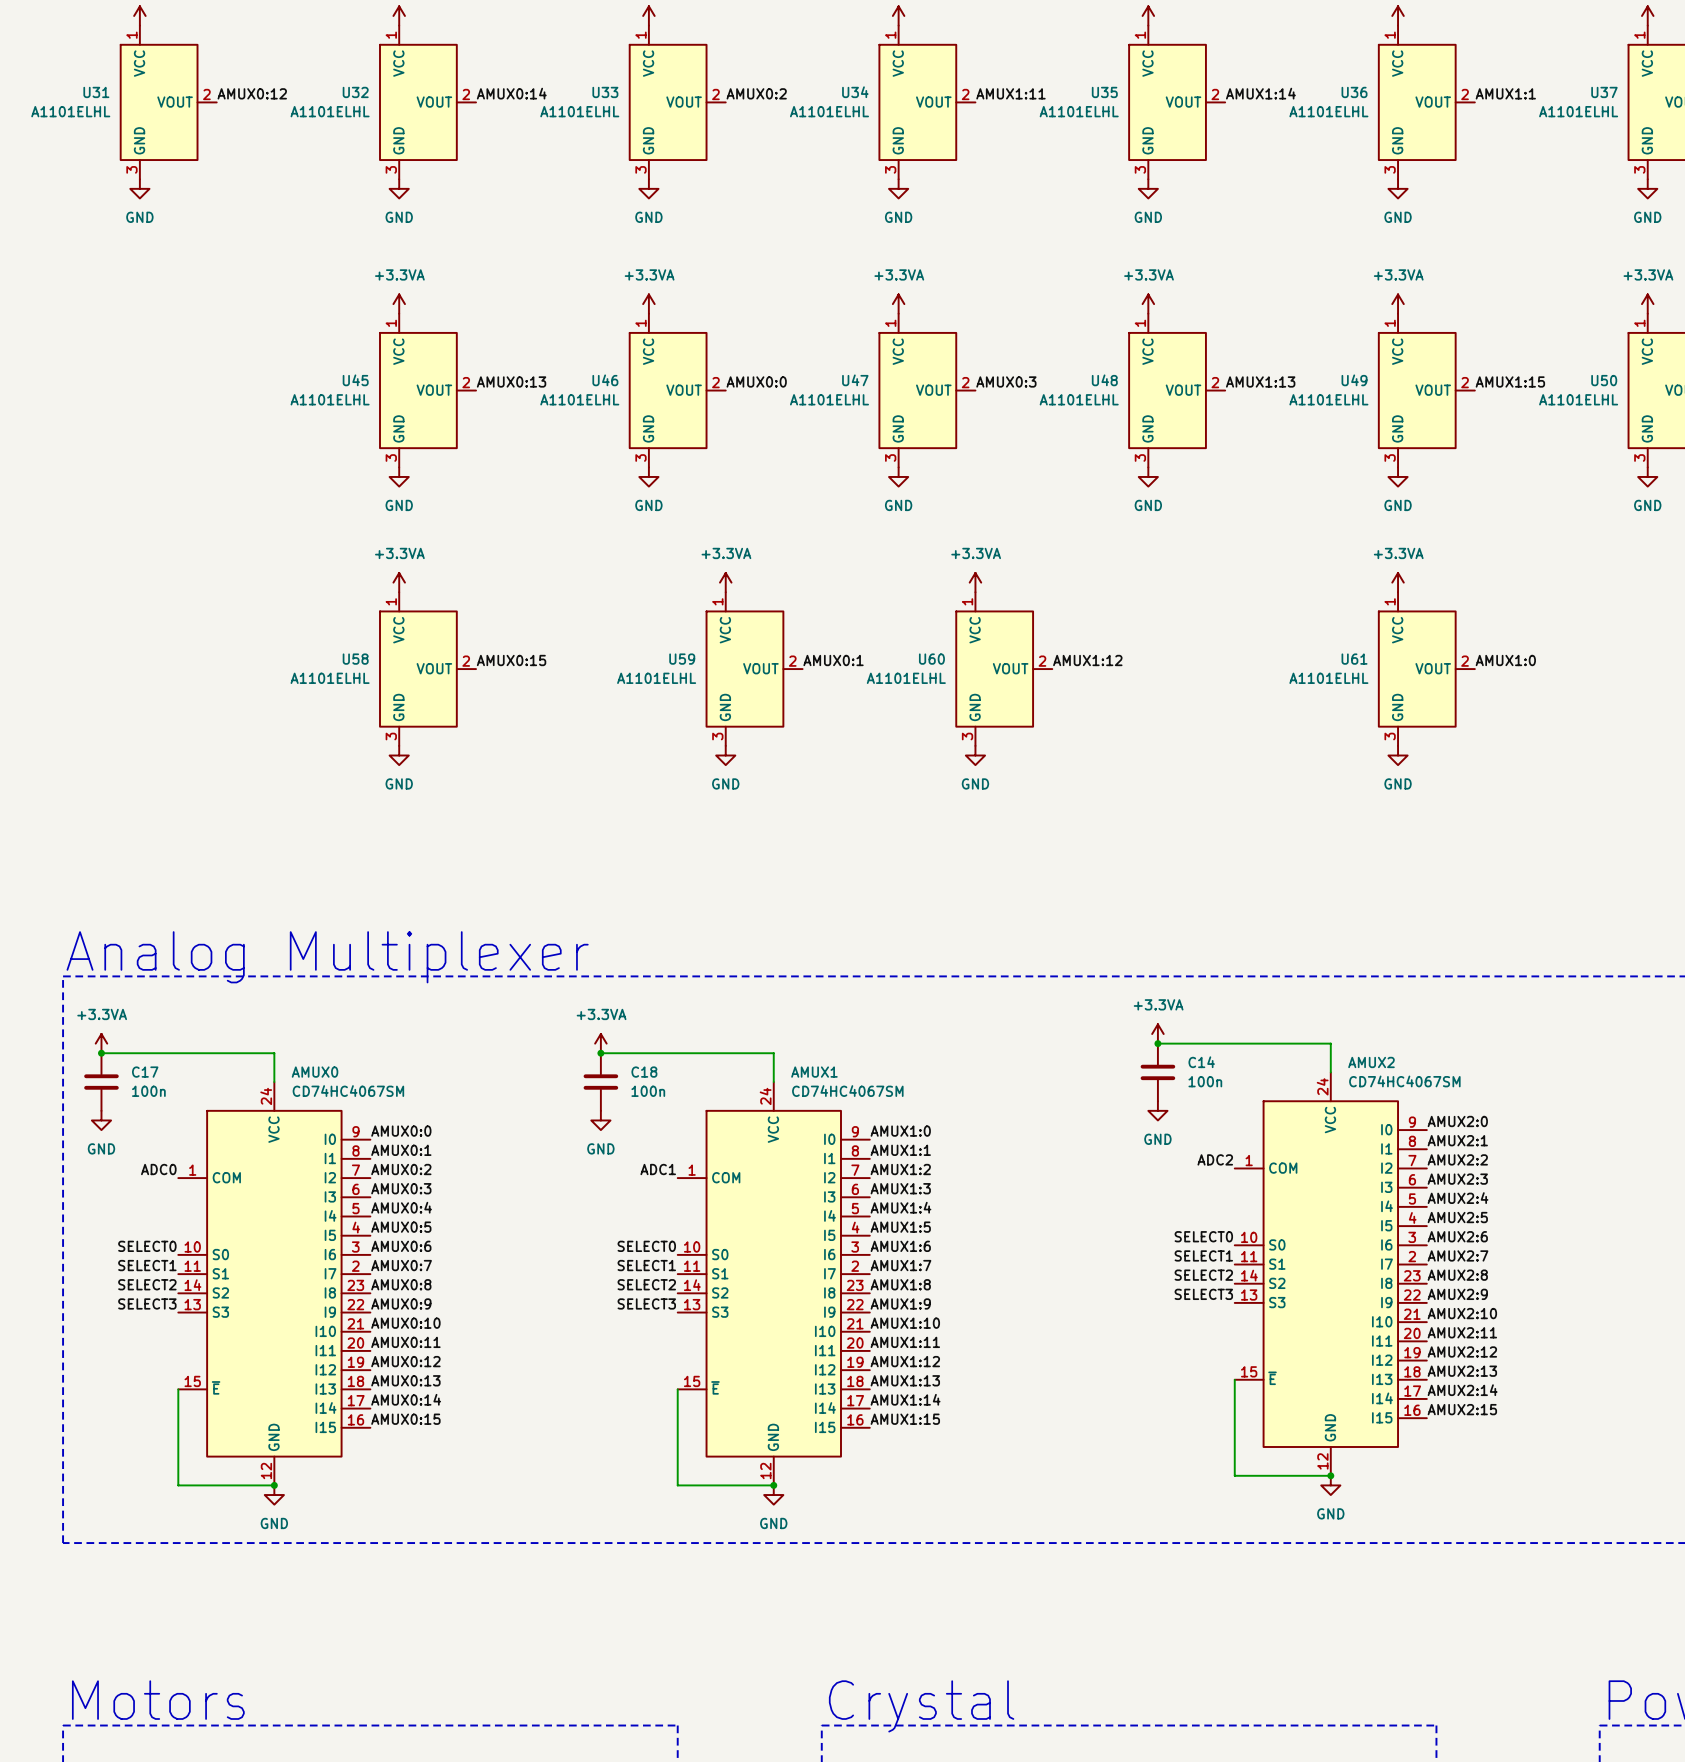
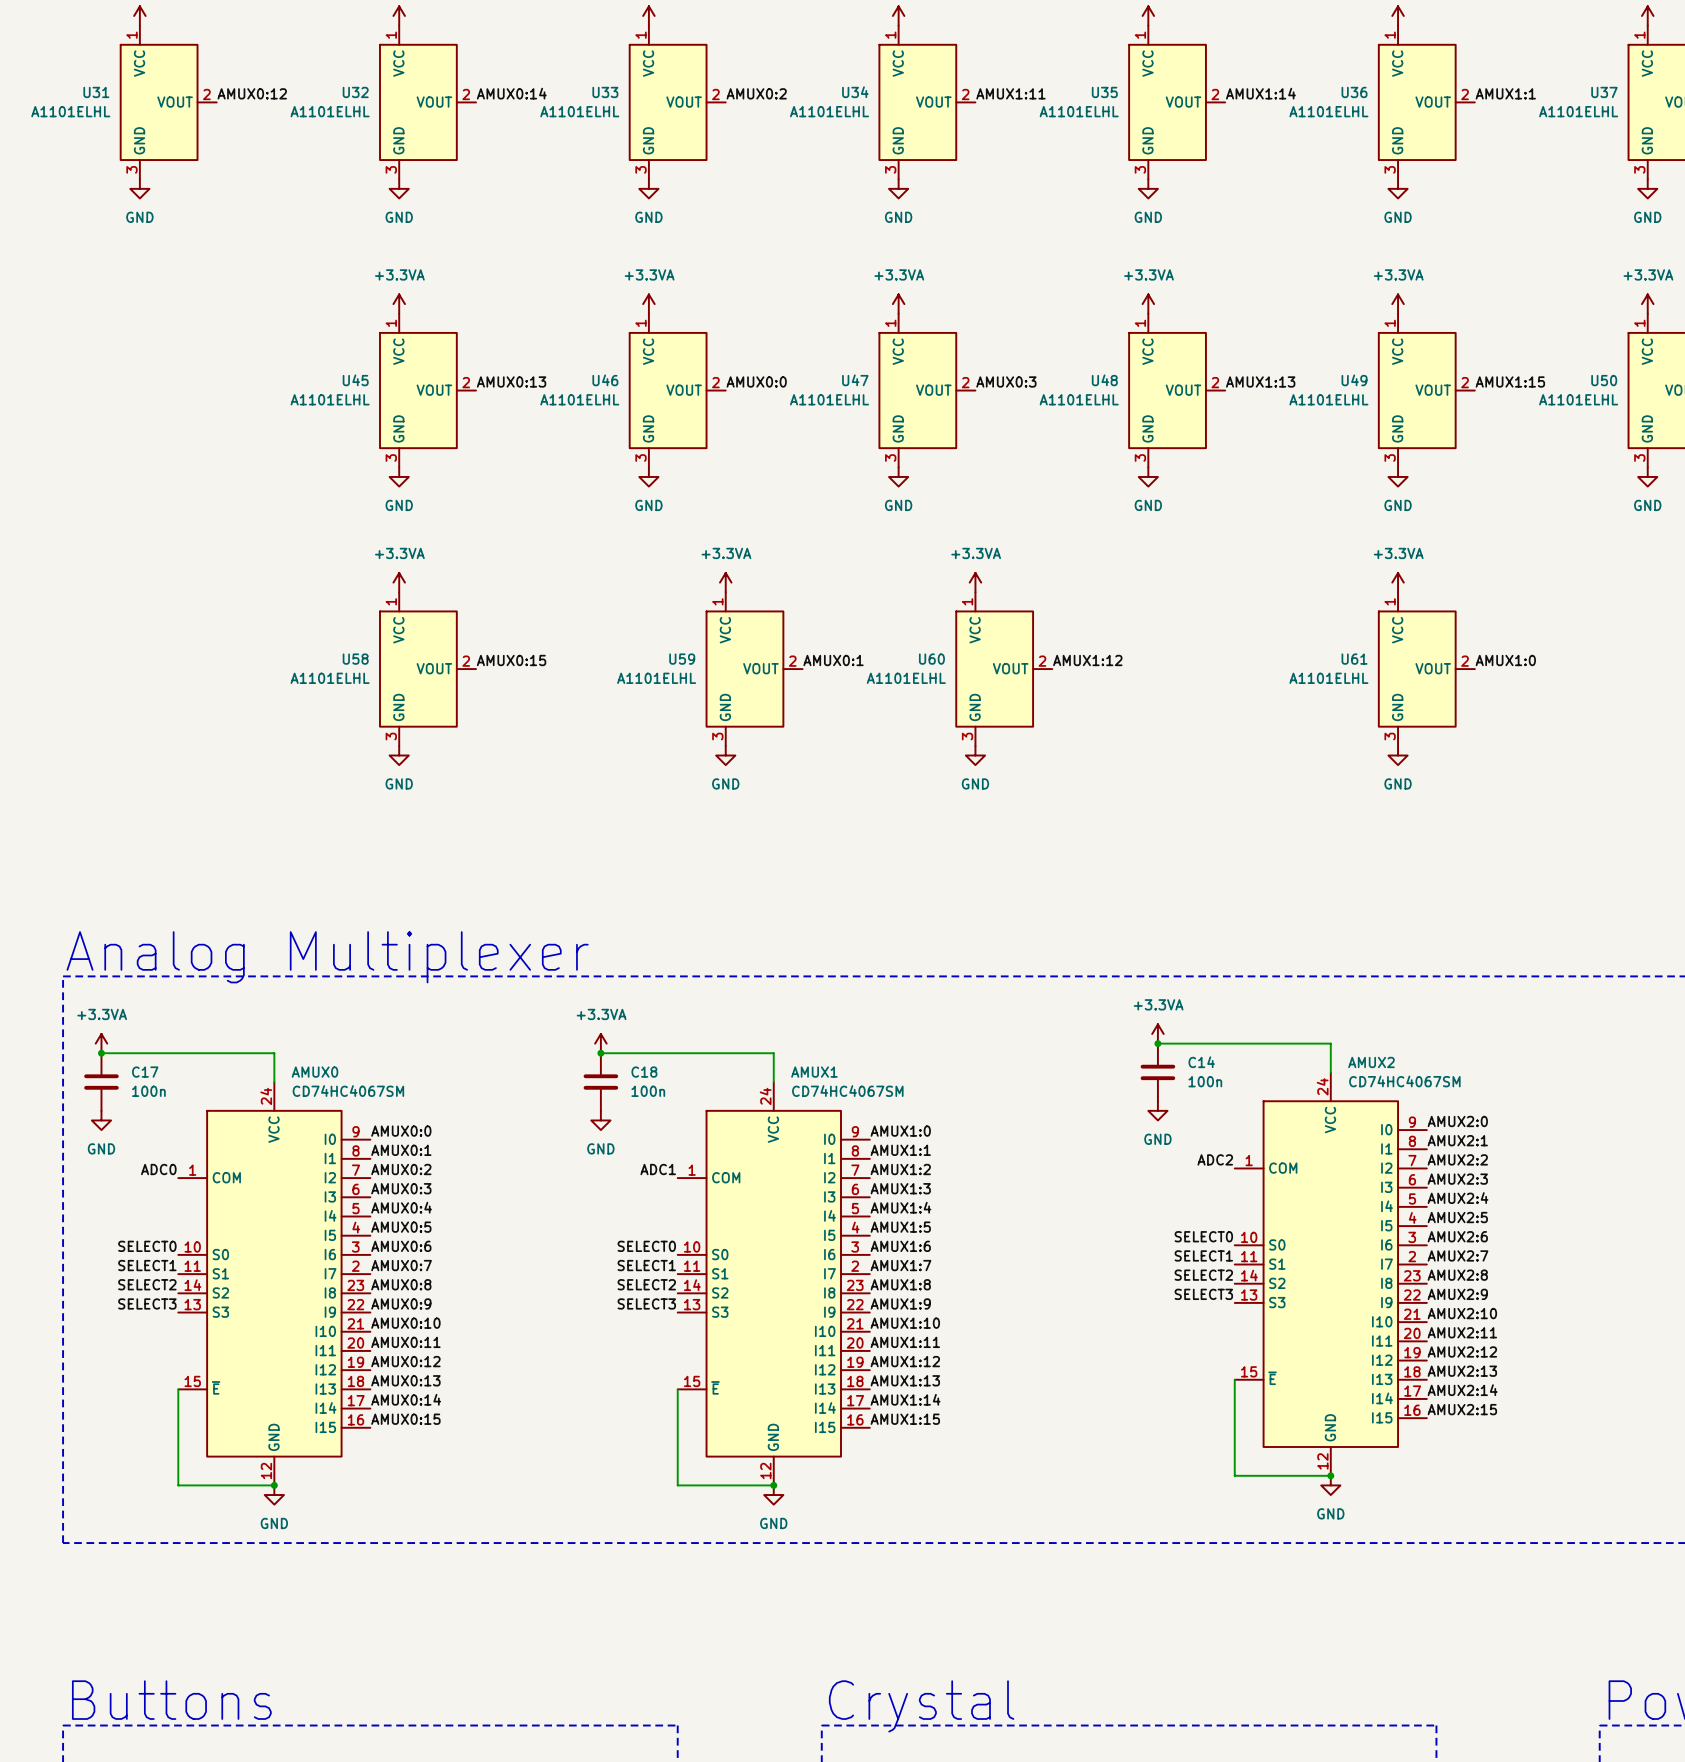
text: Motors (158, 1700) -> Buttons (171, 1700)

